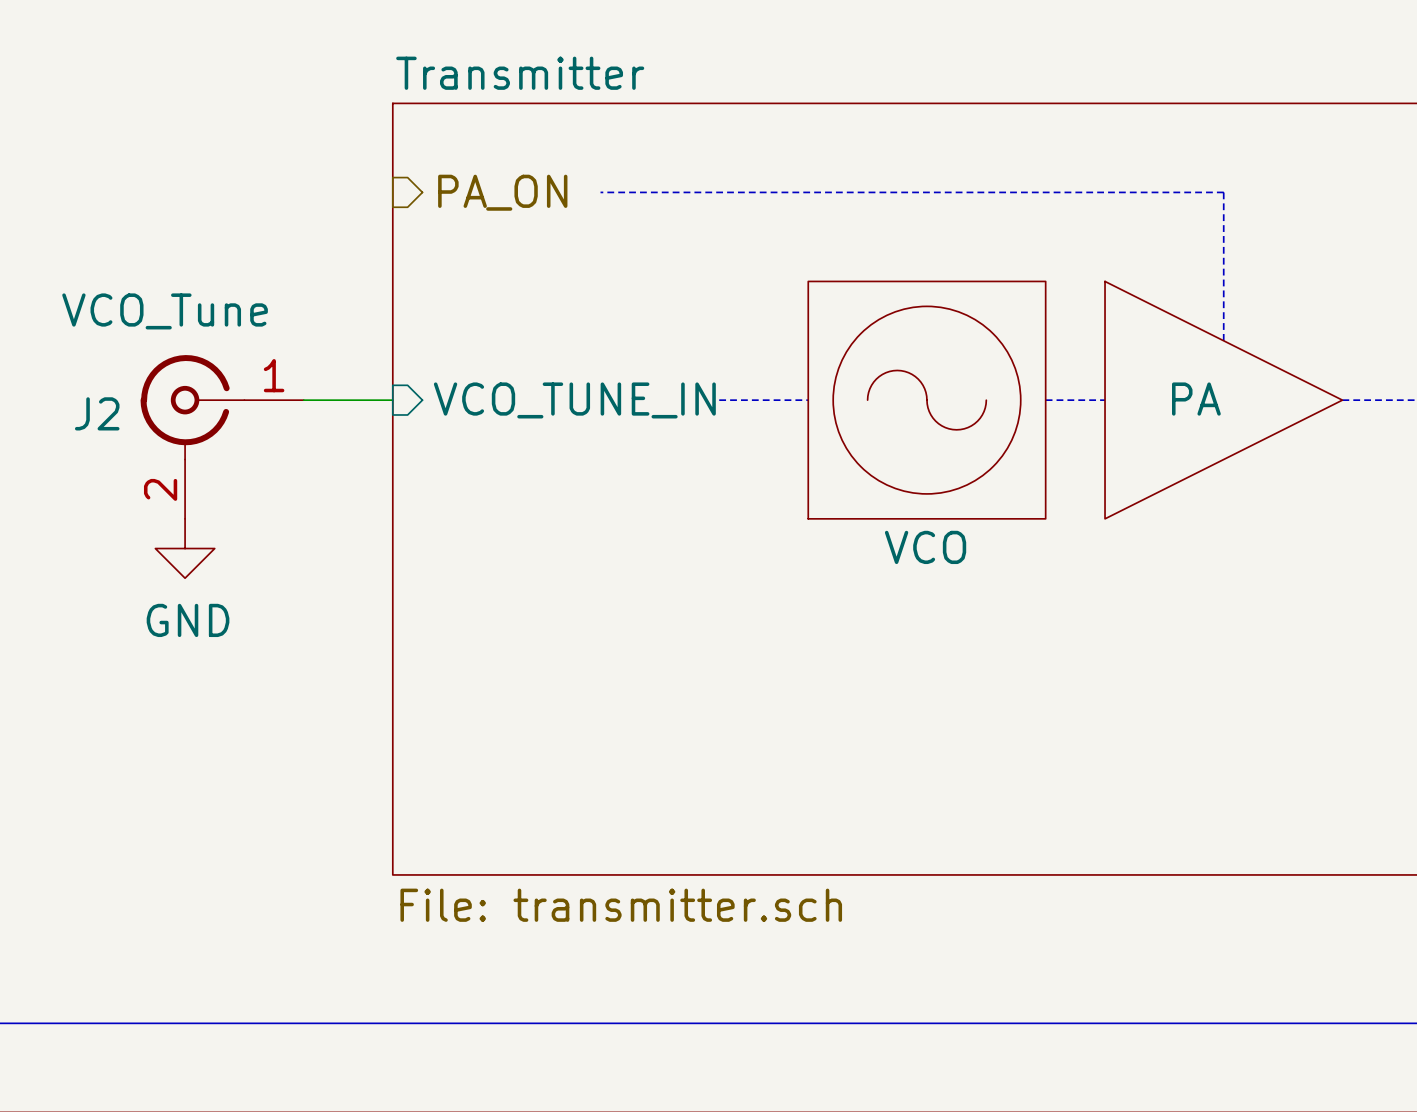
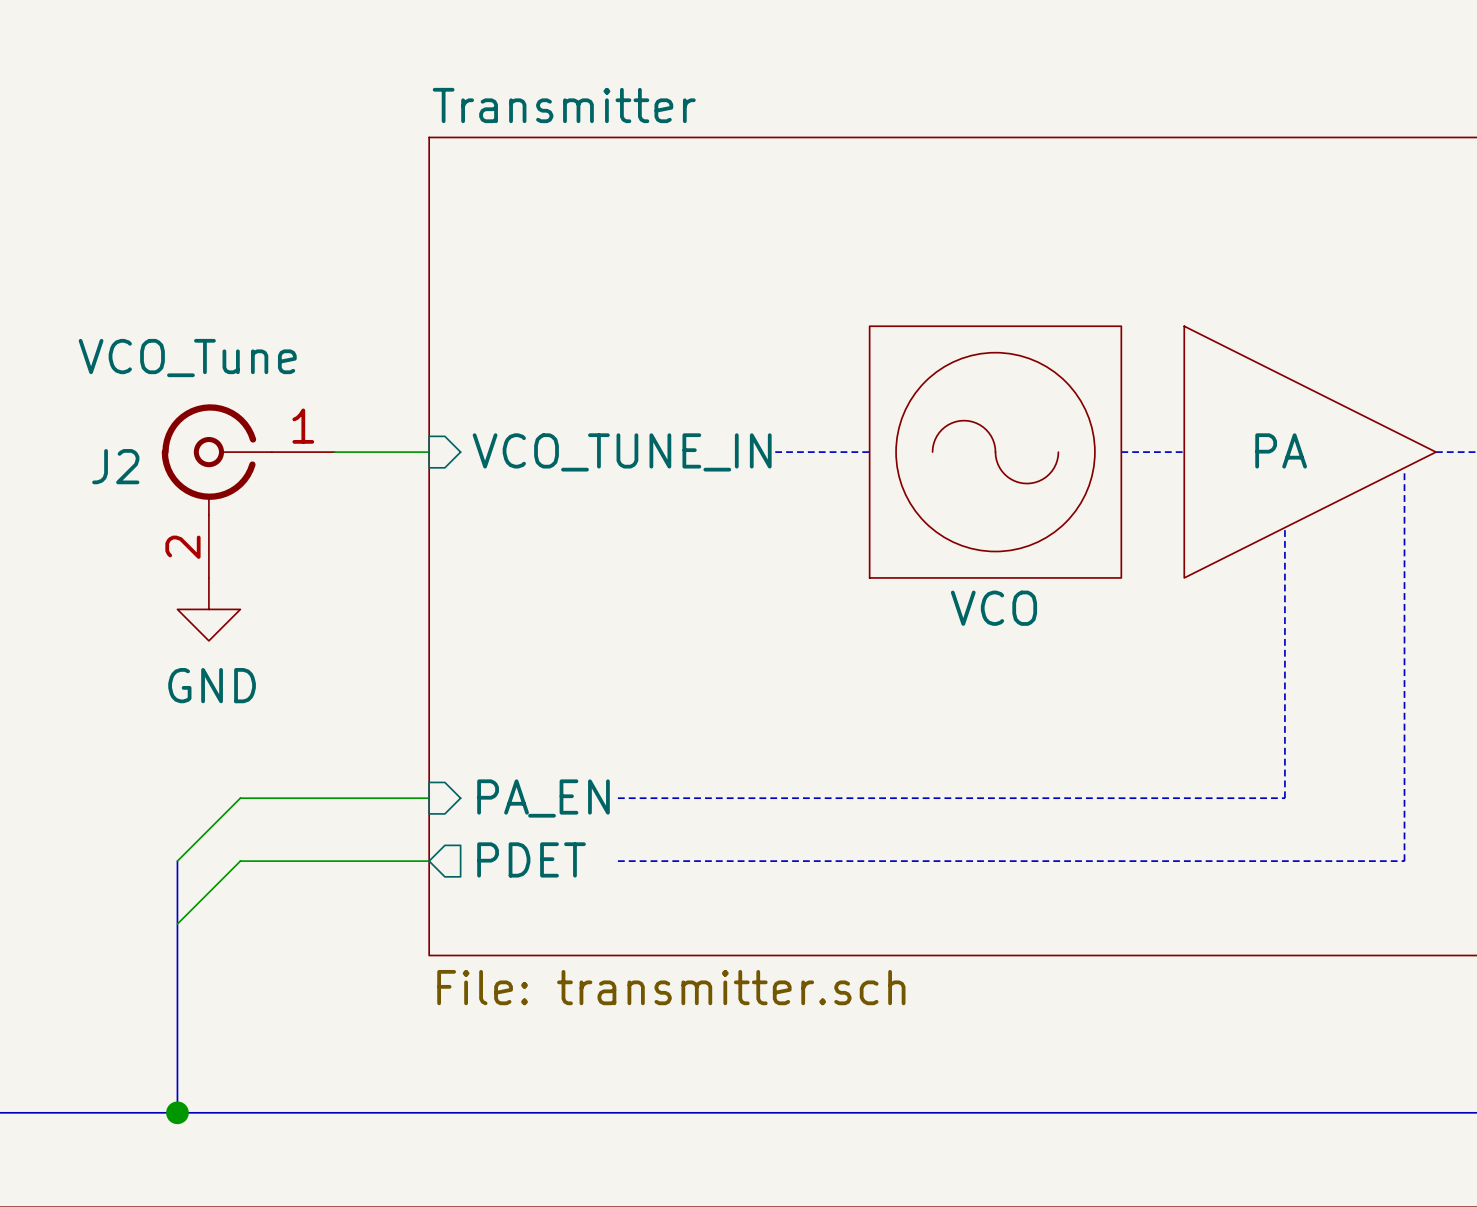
hierarchical label: PA_ON (502, 192) -> none
line: (600, 192) (1223, 192) (1223, 340) -> none
line: none -> (1404, 470) (1404, 861) (617, 861)
line: none -> (1284, 527) (1284, 798) (617, 798)
wire: none -> (429, 798) (240, 798) (177, 861)
sheet pin: none -> PA_EN (543, 798)
sheet pin: none -> PDET (531, 859)
bus: none -> (177, 861) (177, 1112)
wire: none -> (429, 861) (240, 861) (177, 924)
junction: none -> (177, 1112)

